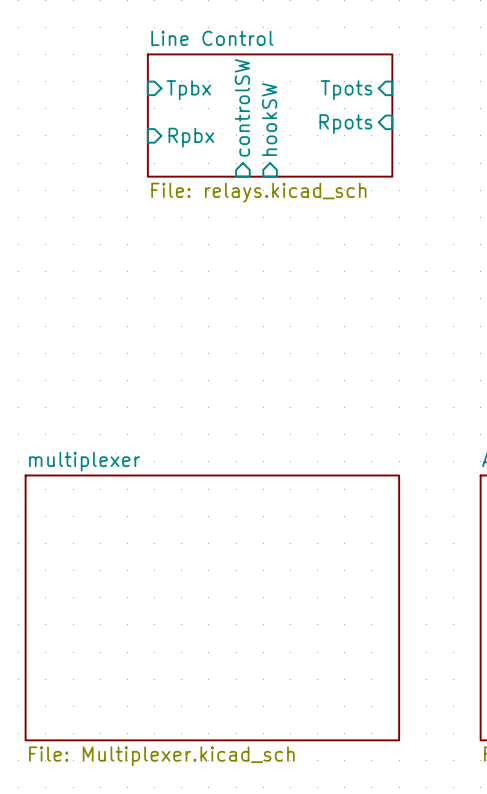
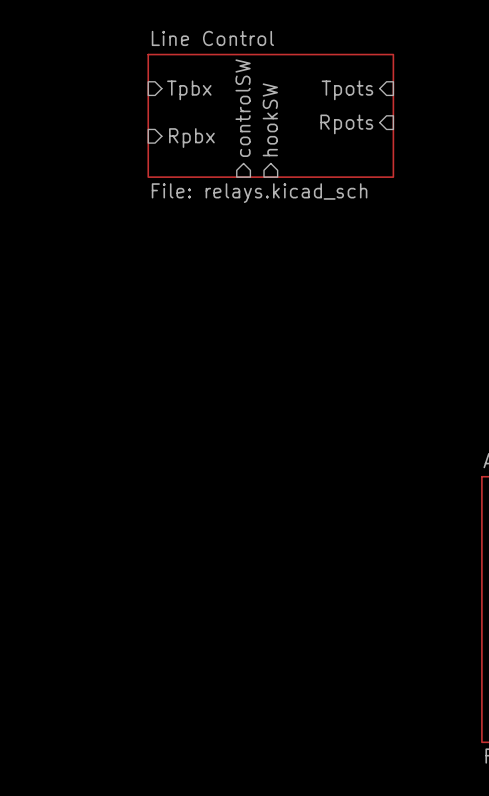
sheet multiplexer: File: Multiplexer.kicad_sch (212, 607) -> none

